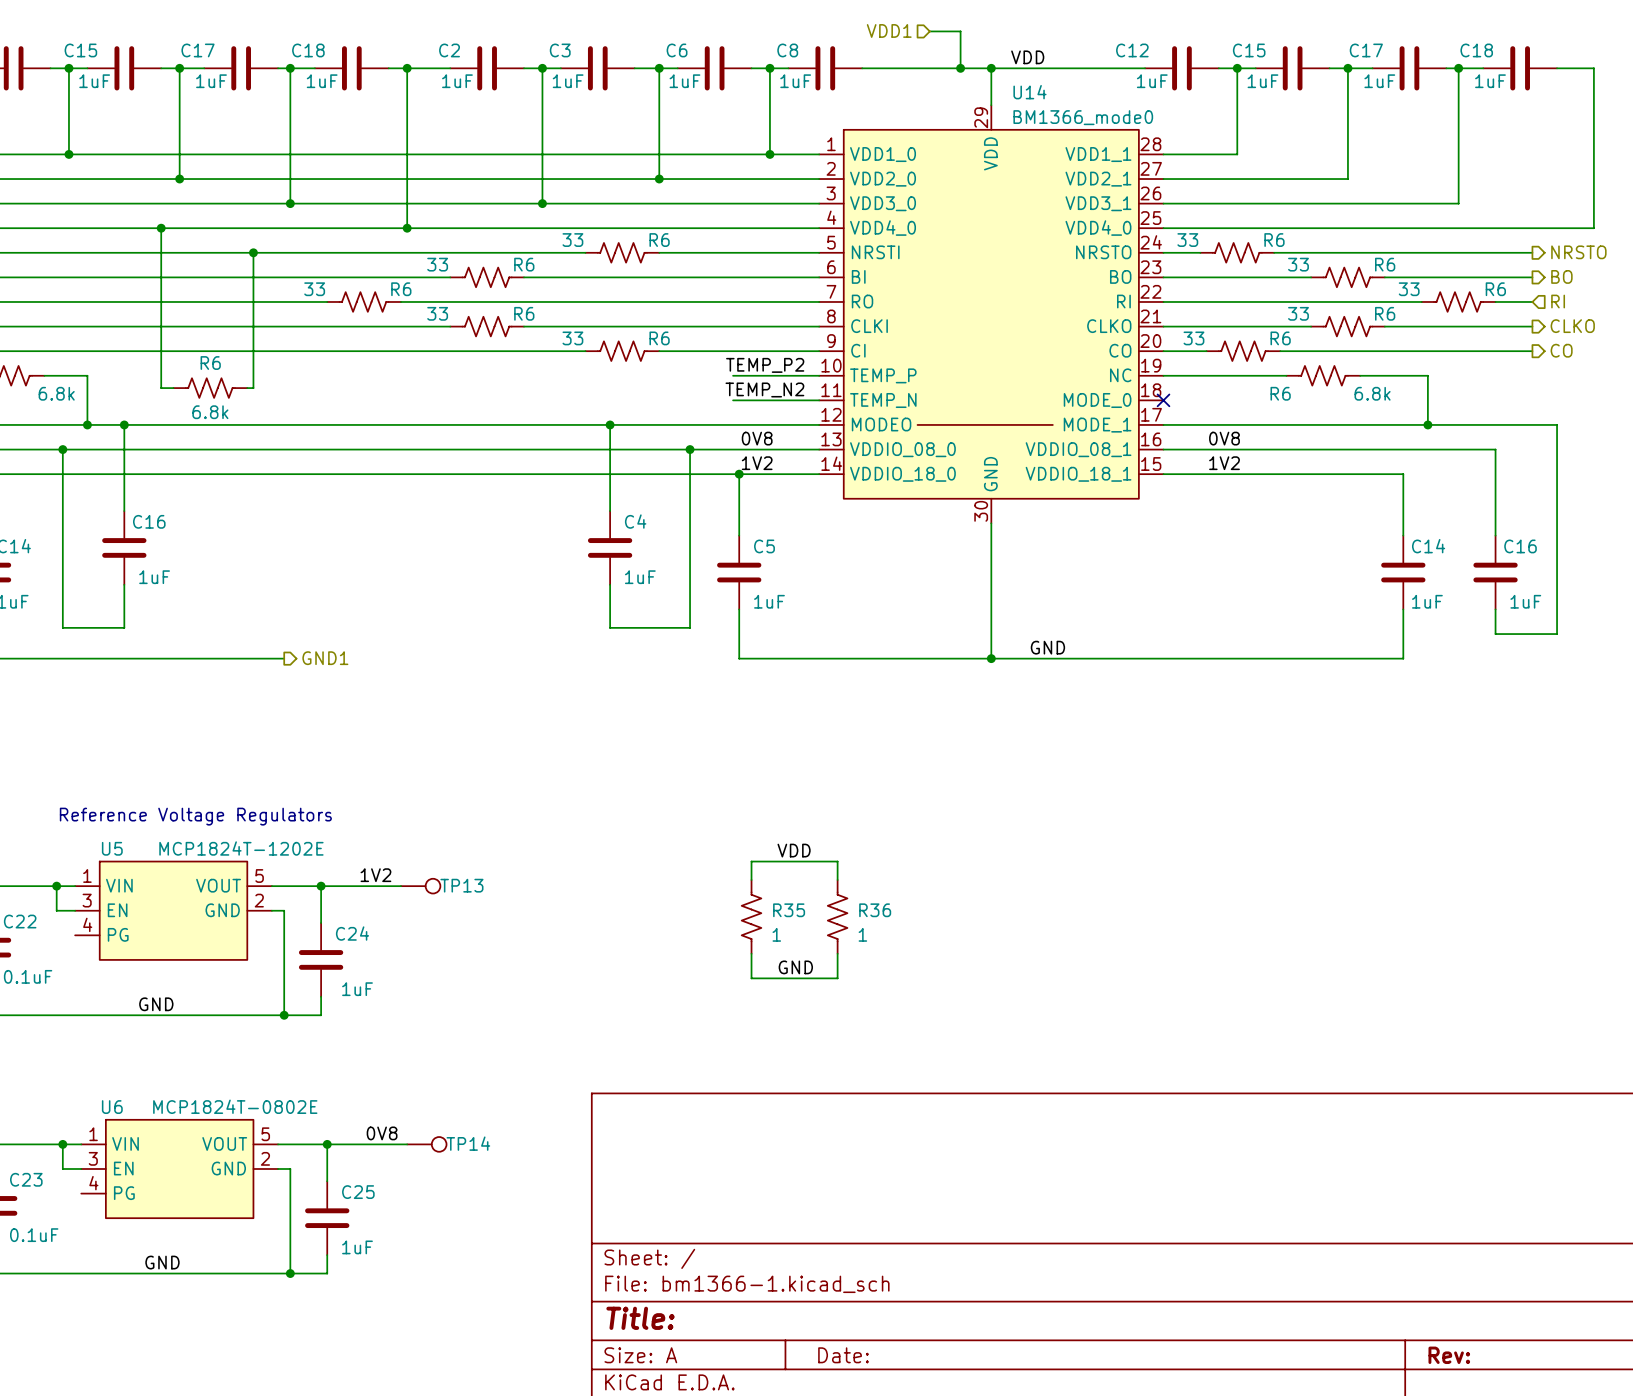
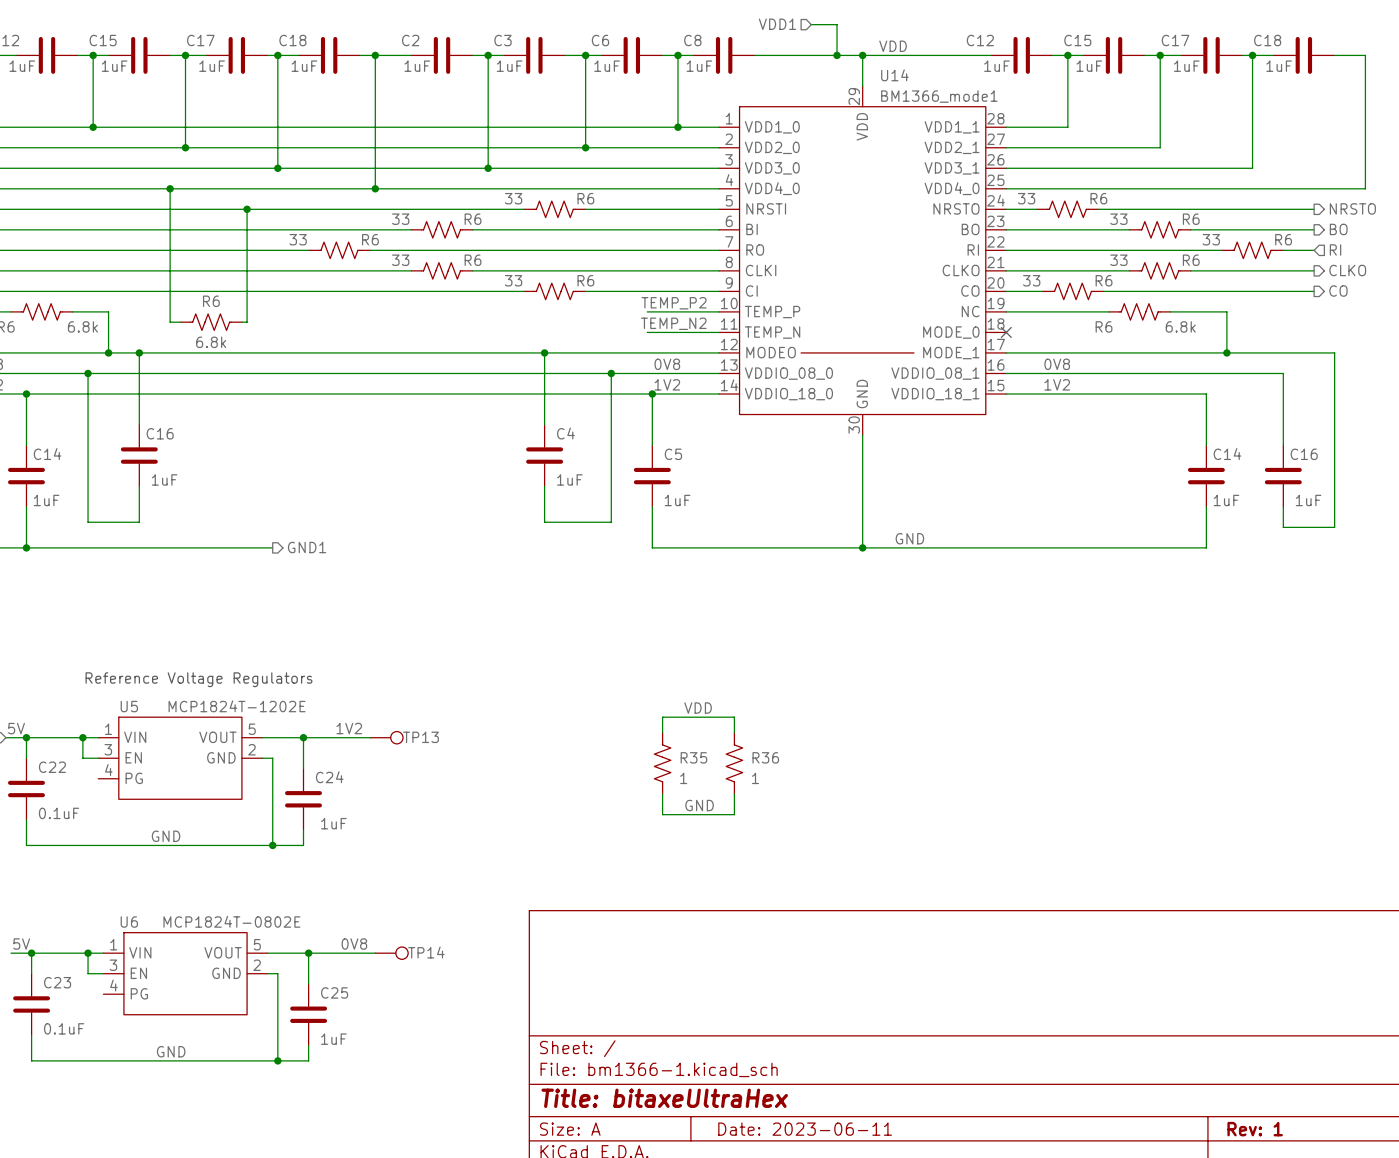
U14 value: BM1366_mode0 (1083, 117) -> BM1366_mode1 (939, 96)
title block: Title: (640, 1318) -> Title: bitaxeUltraHex (664, 1098)
title block: Date: (843, 1355) -> Date: 2023-06-11 (805, 1129)
title block: Rev: (1449, 1355) -> Rev: 1 (1255, 1129)

